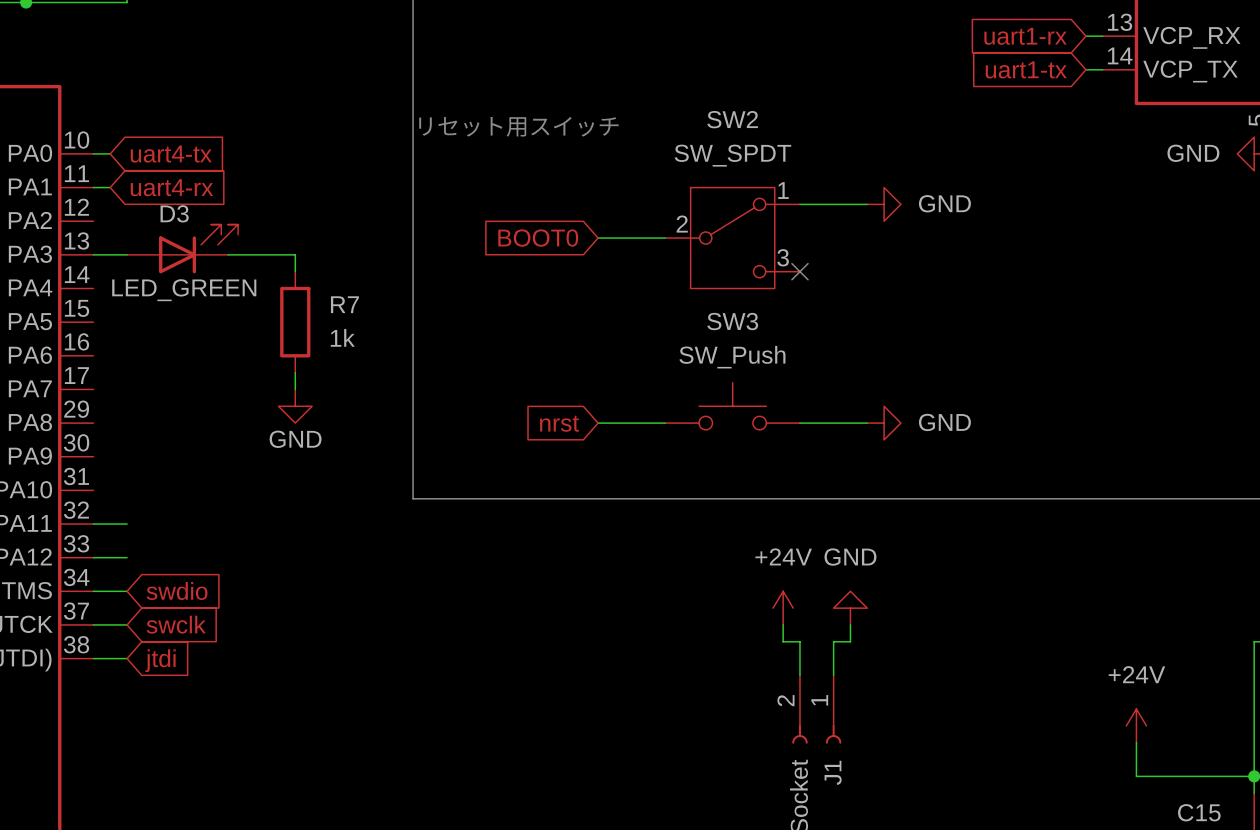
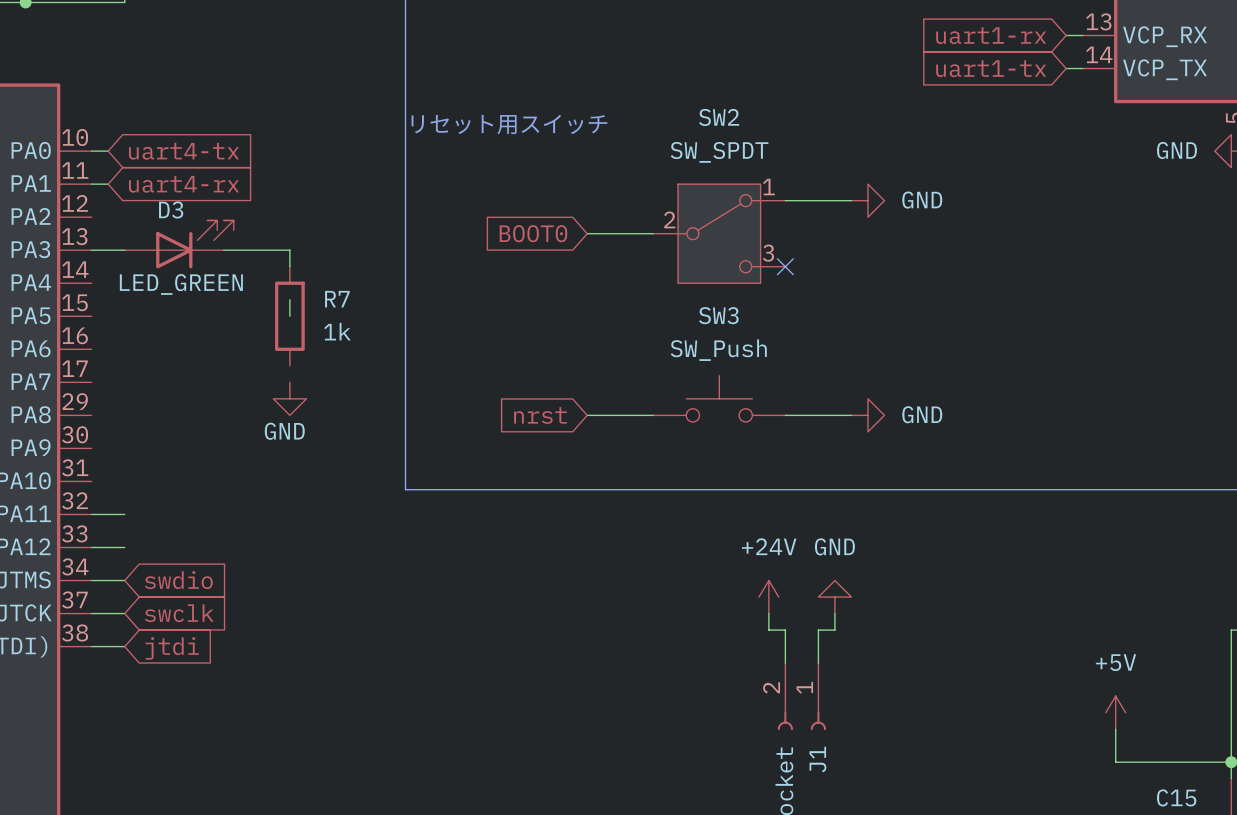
wire: (295, 372) (295, 389) -> (289, 299) (289, 316)
power symbol: +24V (1136, 725) -> +5V (1115, 712)

